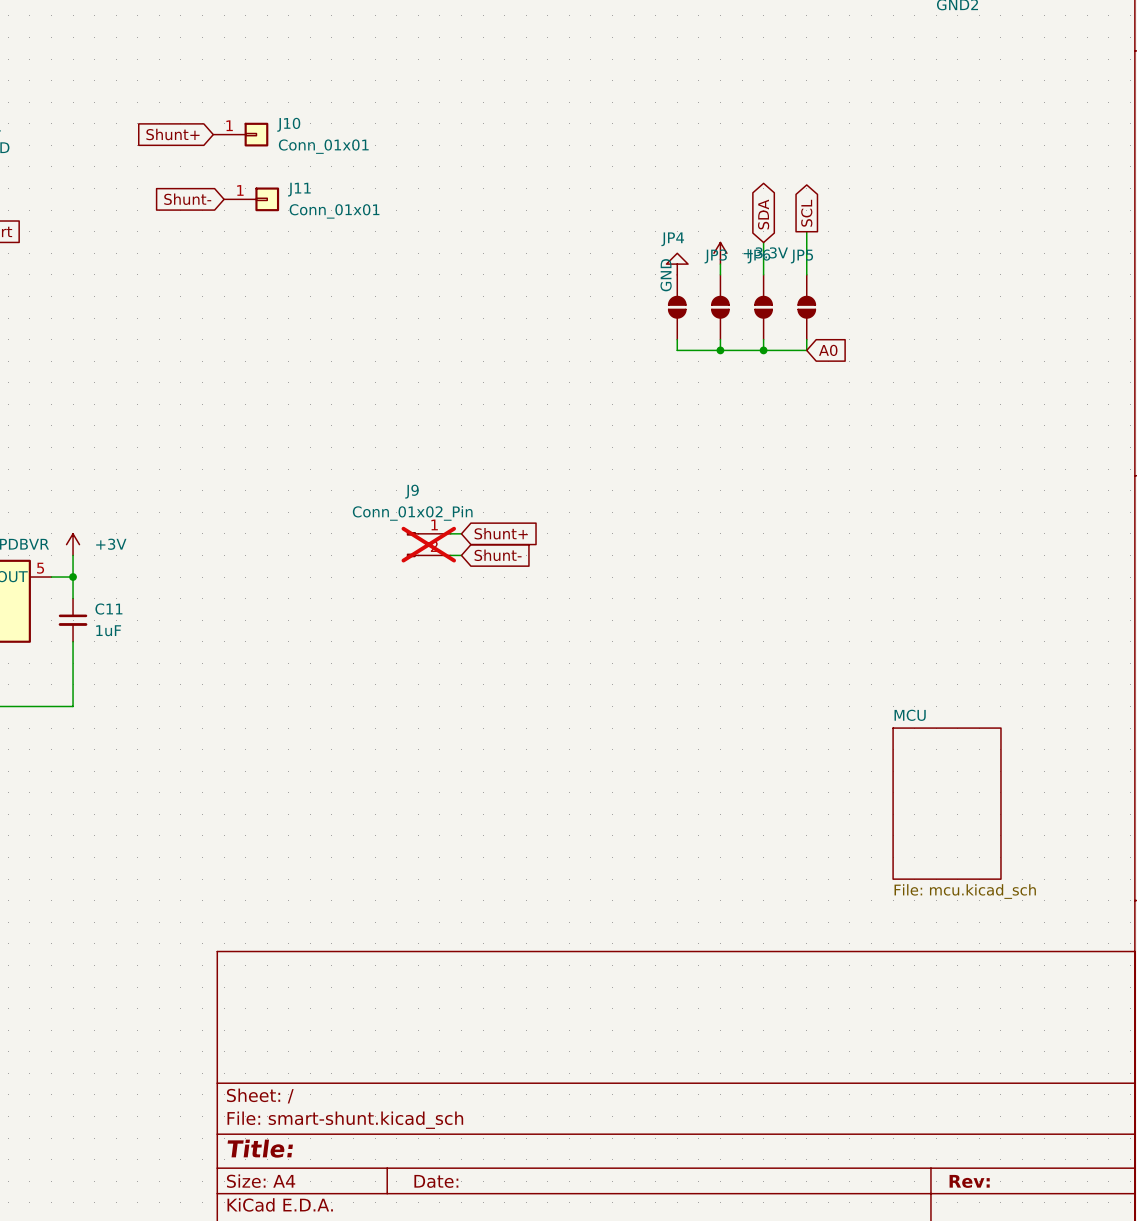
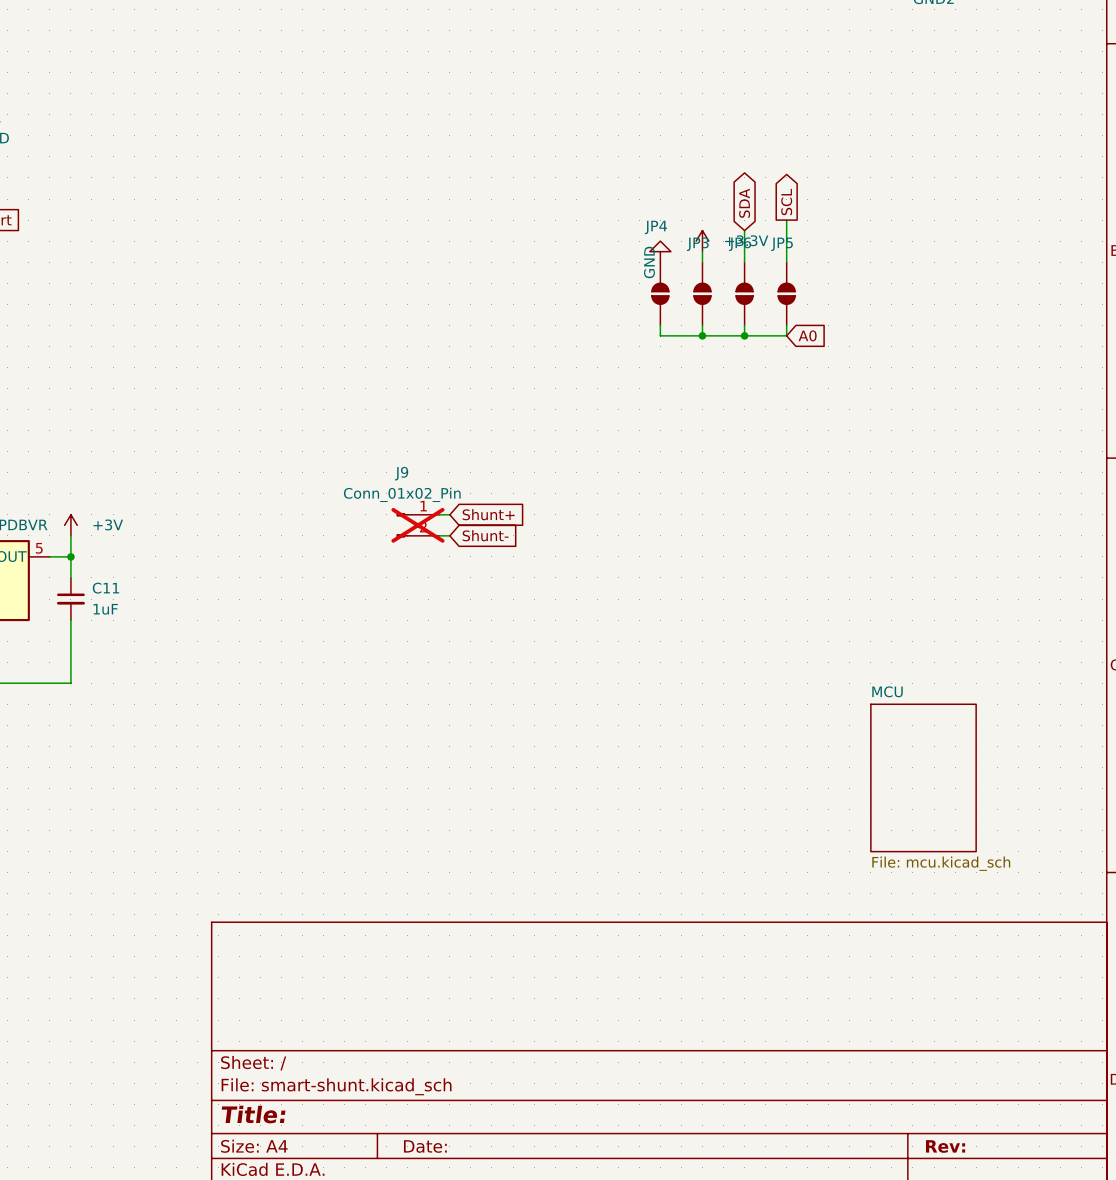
global label: Shunt+ (172, 134) -> none
J10: Conn_01x01 (240, 134) -> none
global label: Shunt- (187, 199) -> none
J11: Conn_01x01 (251, 199) -> none

